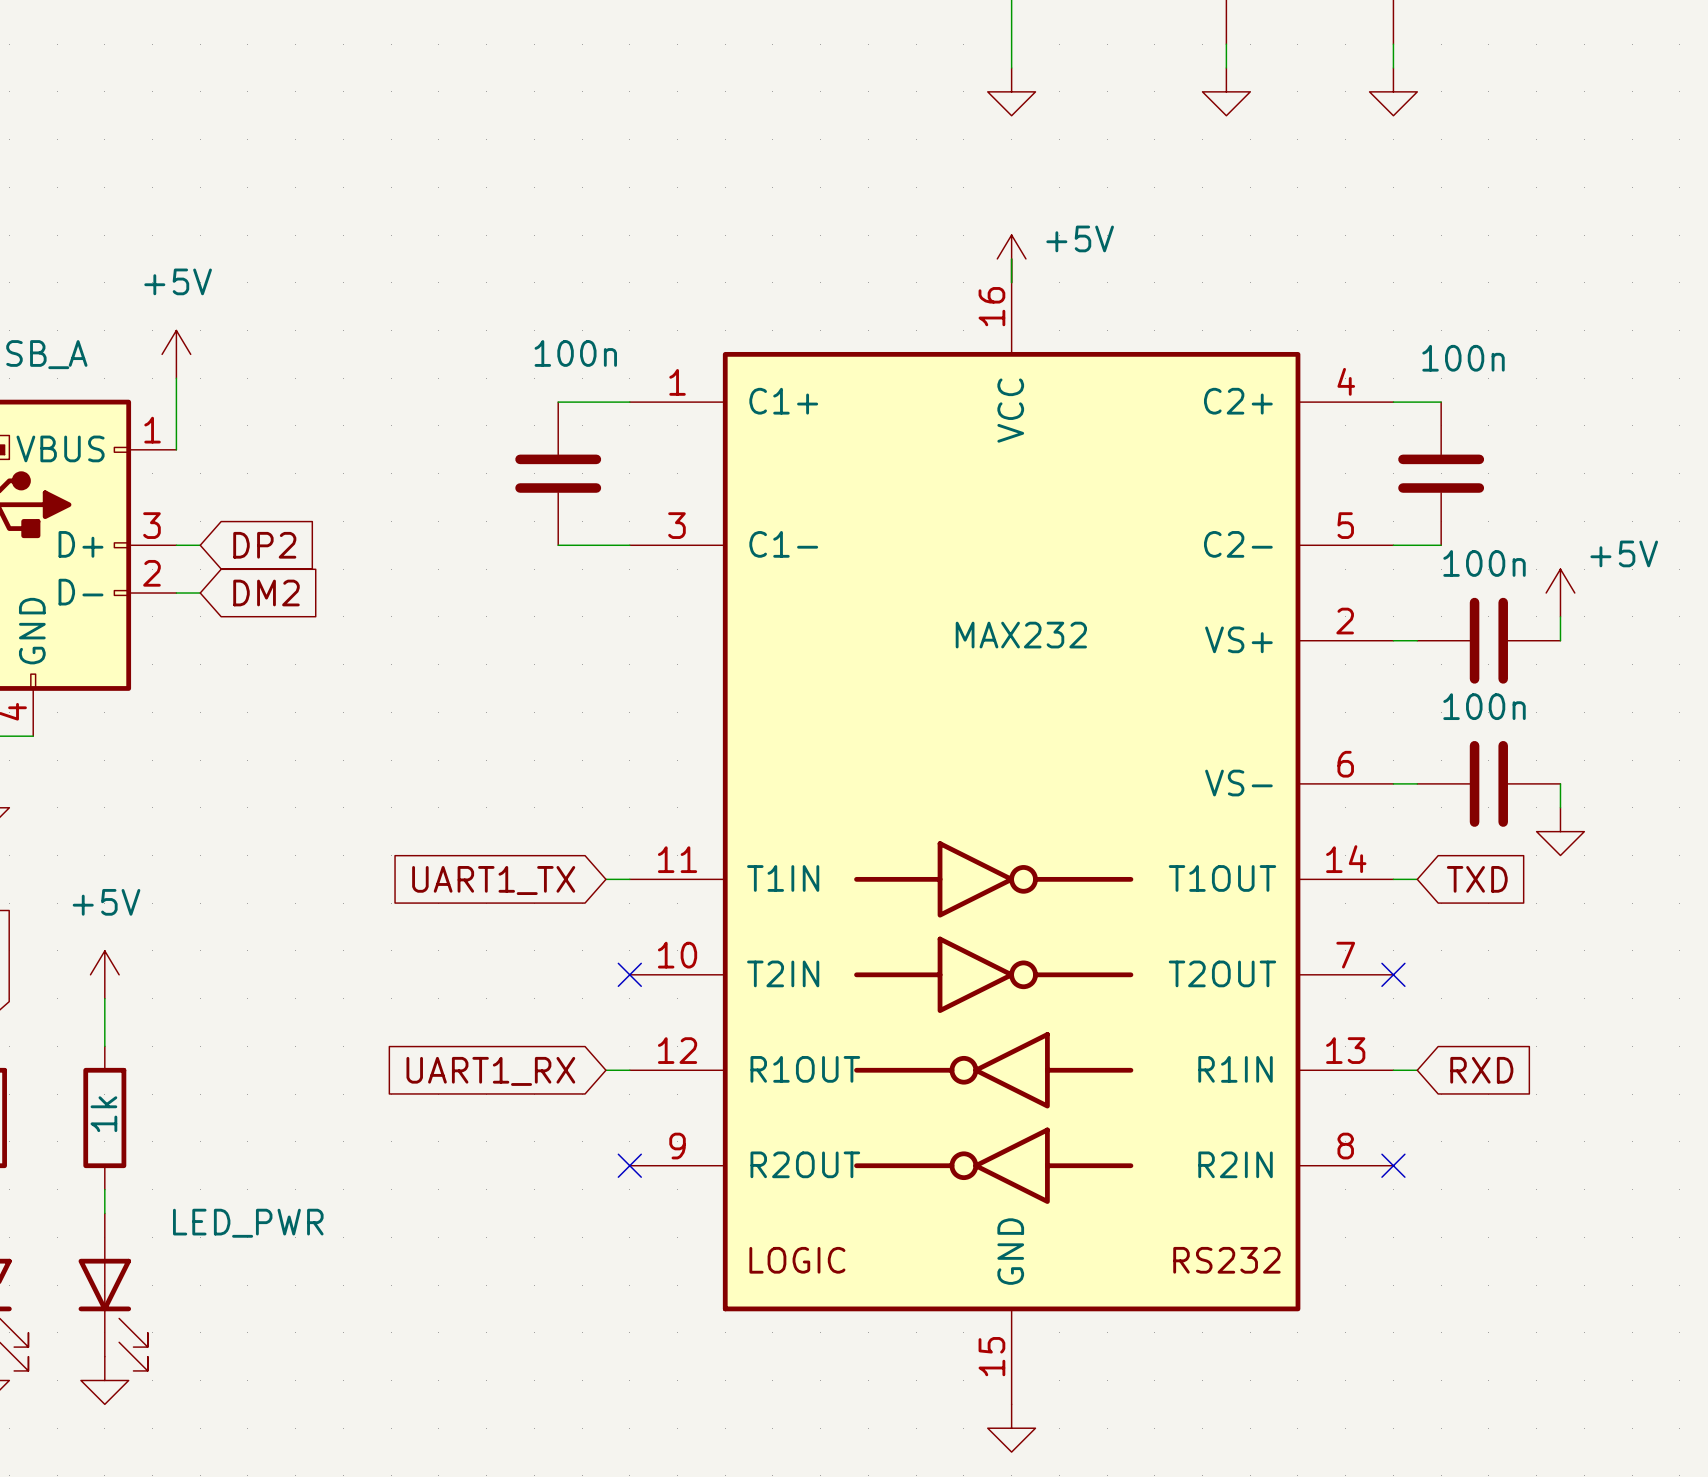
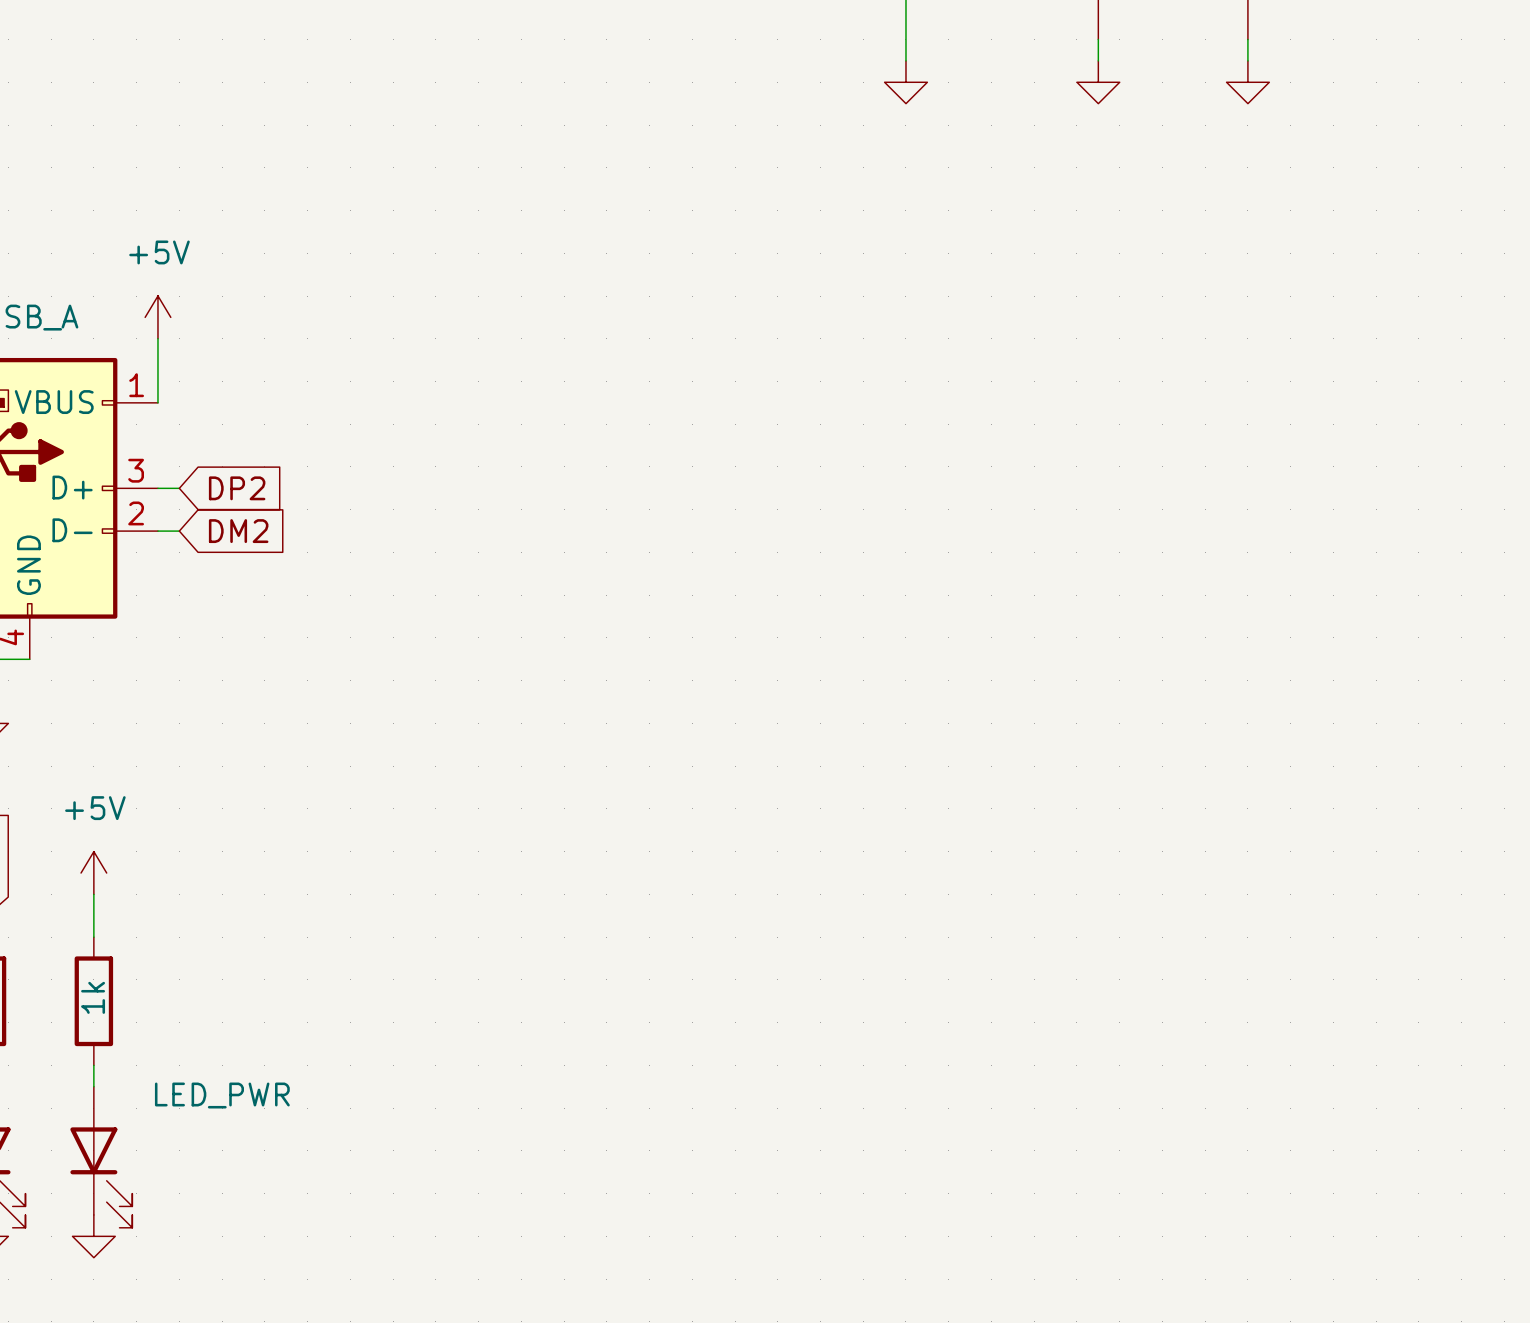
wire: (1011, 258) (1011, 282) -> none
power symbol: +5V (1011, 258) -> none
wire: (558, 402) (629, 402) -> none
wire: (1393, 402) (1441, 402) -> none
part: 100n (558, 473) -> none
part: 100n (1441, 473) -> none
wire: (558, 545) (629, 545) -> none
wire: (1393, 545) (1441, 545) -> none
power symbol: +5V (1560, 593) -> none
wire: (1560, 616) (1560, 640) -> none
wire: (1393, 640) (1417, 640) -> none
part: 100n (1488, 640) -> none
wire: (1393, 783) (1417, 783) -> none
part: 100n (1488, 783) -> none
wire: (1560, 783) (1560, 807) -> none
part: MAX232 (1011, 831) -> none
power symbol: (1560, 831) -> none
wire: (605, 879) (629, 879) -> none
wire: (1393, 879) (1417, 879) -> none
global label: TXD (1477, 879) -> none
global label: UART1_TX (493, 880) -> none
no-connect mark: (629, 974) -> none
no-connect mark: (1393, 974) -> none
wire: (605, 1070) (629, 1070) -> none
wire: (1393, 1070) (1417, 1070) -> none
global label: RXD (1481, 1070) -> none
global label: UART1_RX (490, 1071) -> none
no-connect mark: (629, 1165) -> none
no-connect mark: (1393, 1165) -> none
power symbol: (1011, 1428) -> none

